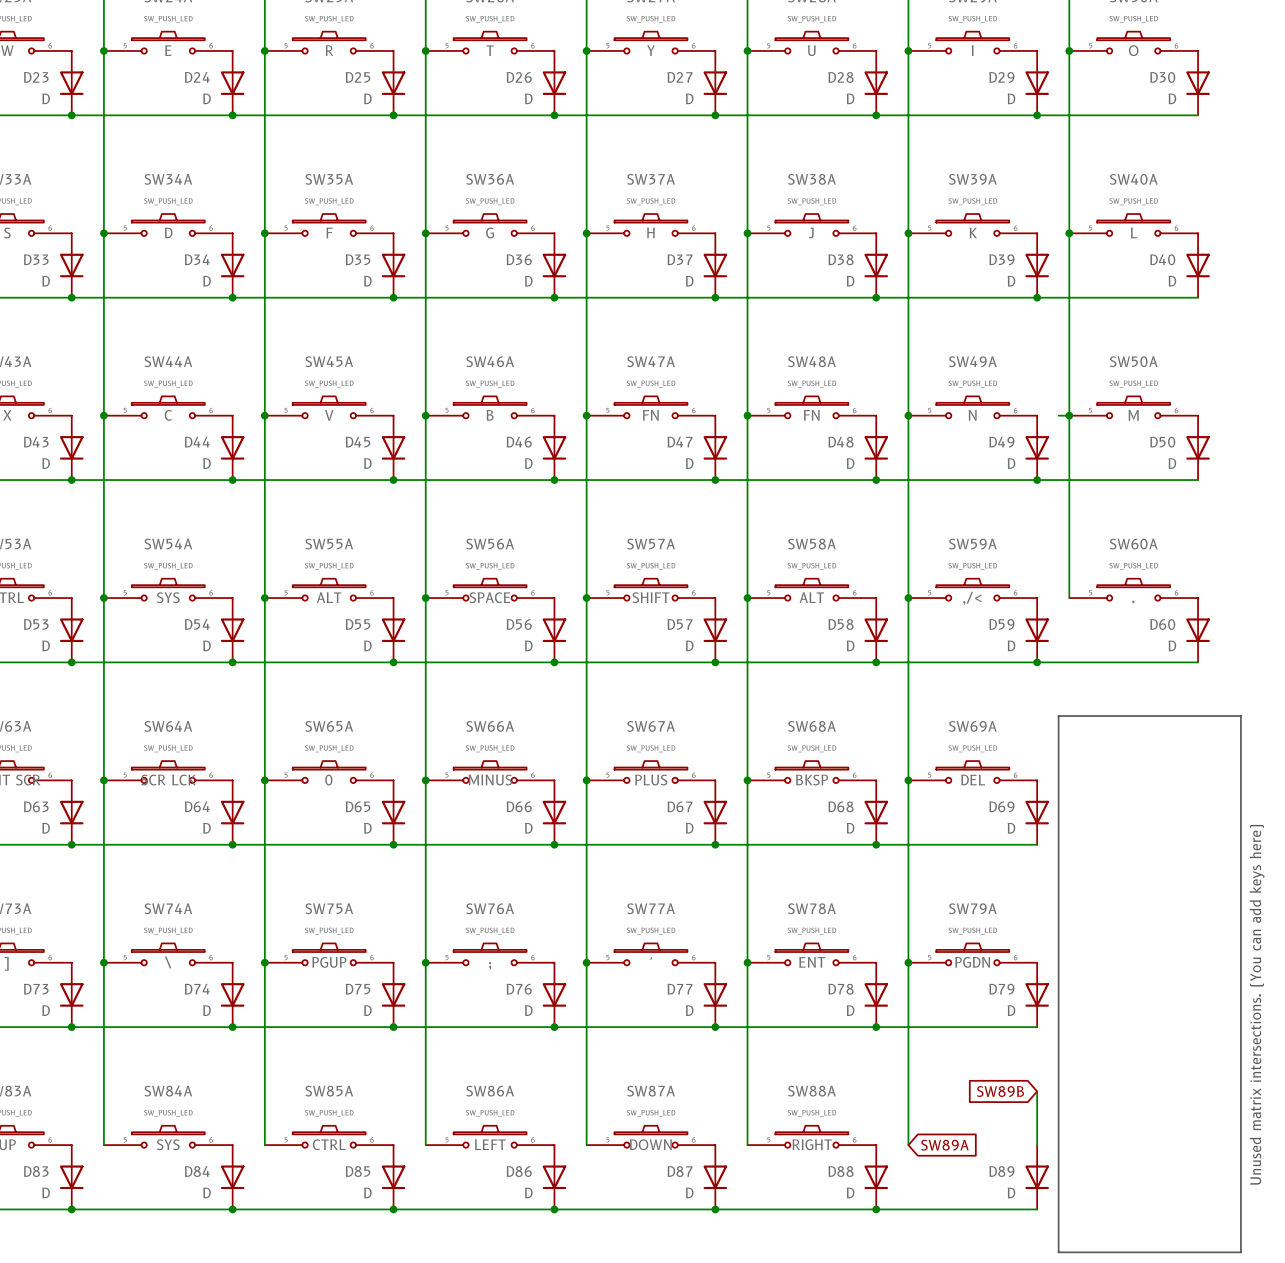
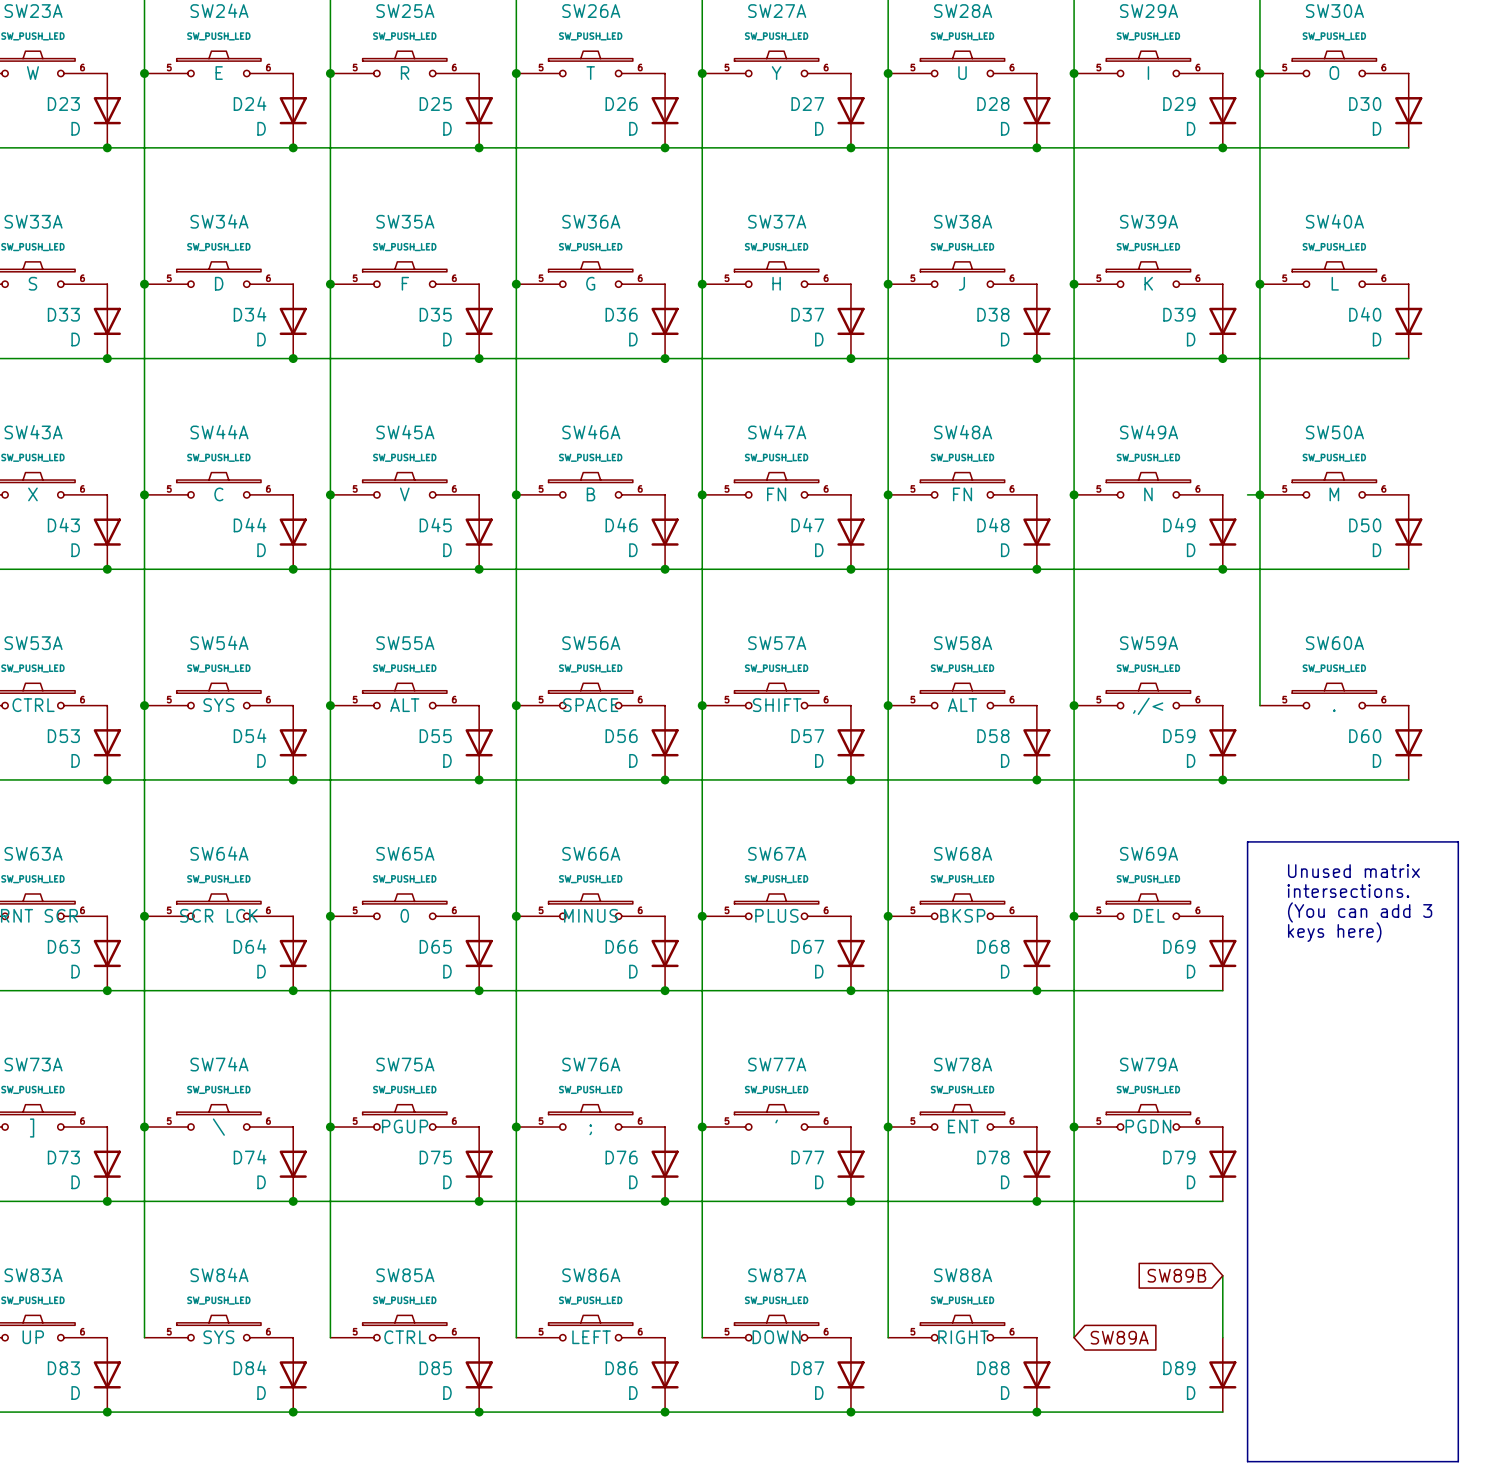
text: none -> Unused matrix (1353, 871)
text: none -> intersections. (1348, 891)
text: none -> (You can add 3 (1360, 912)
text: none -> keys here) (1334, 932)
text: Unused matrix intersections. (You can add keys here) (1257, 1004) -> none

